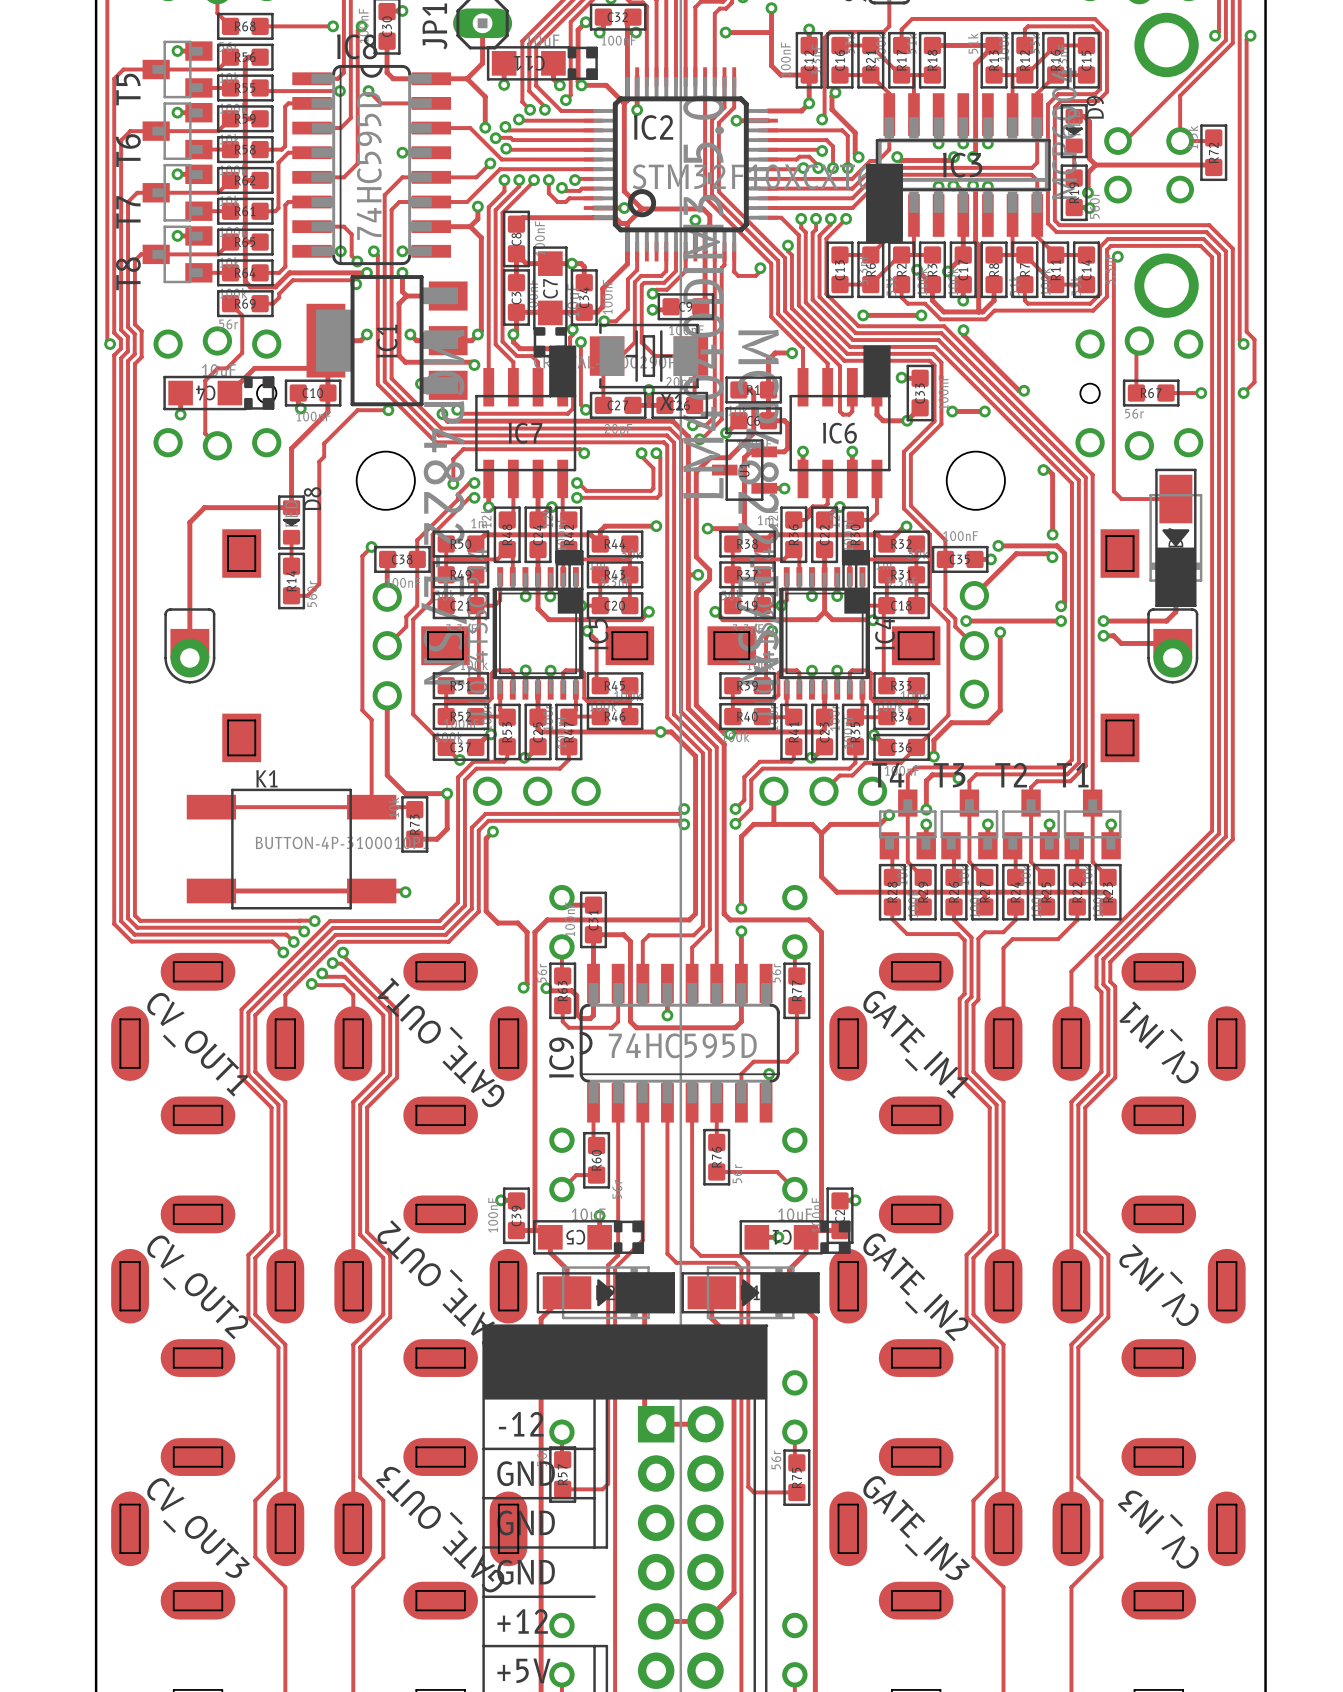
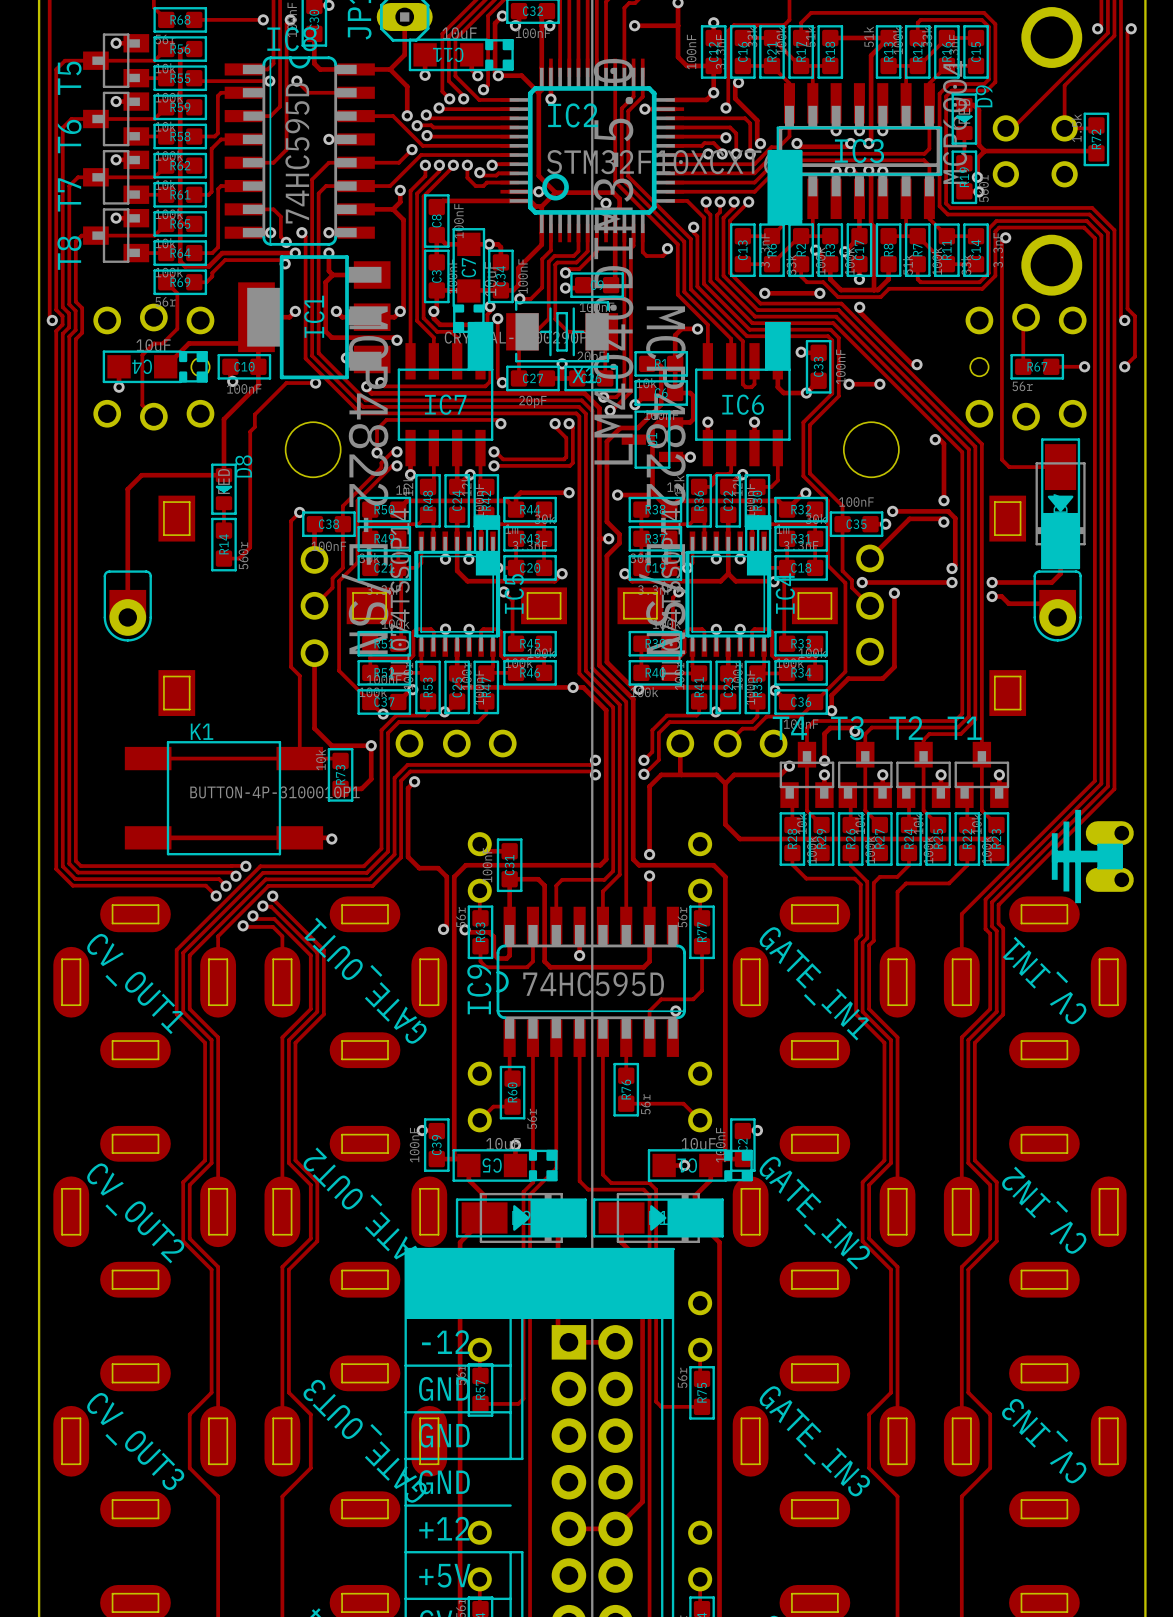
part: none -> (1092, 856)

